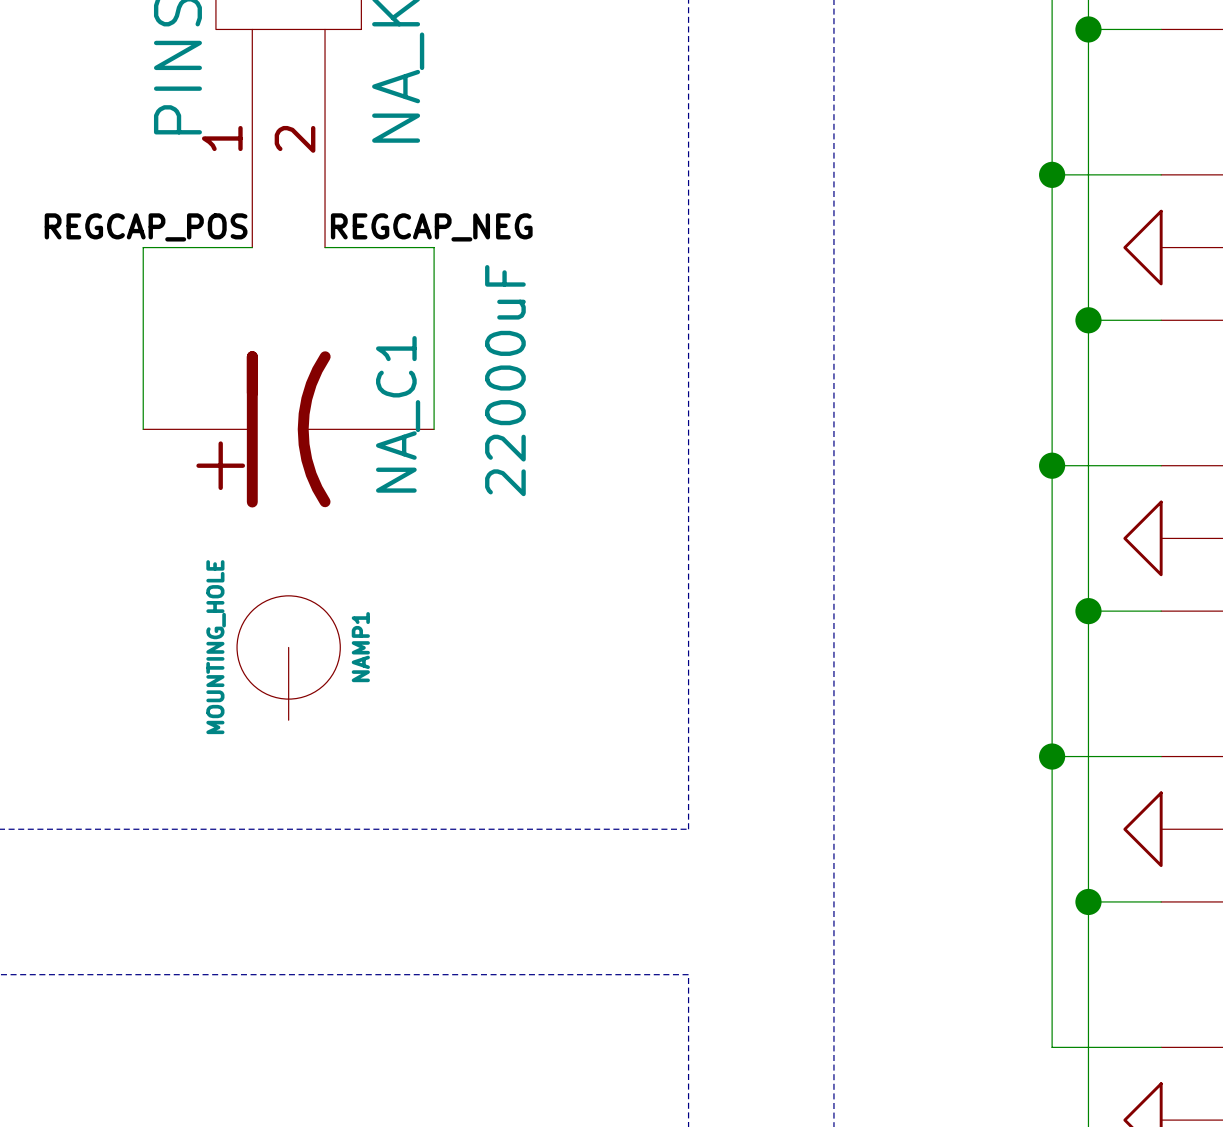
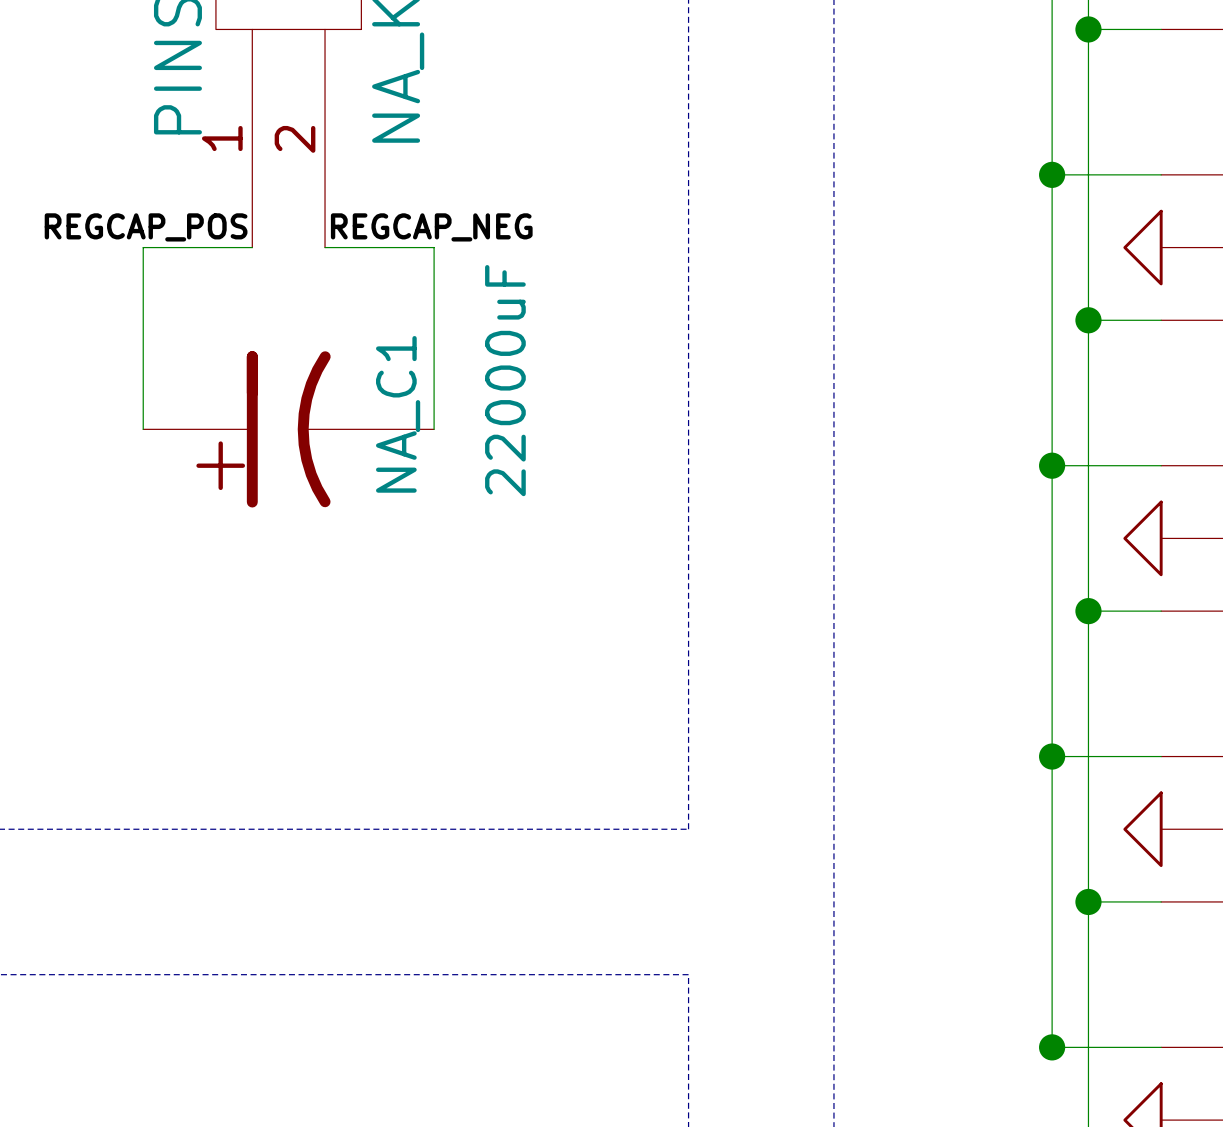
NAMP1: MOUNTING_HOLE (288, 658) -> none
junction: none -> (1052, 1047)

